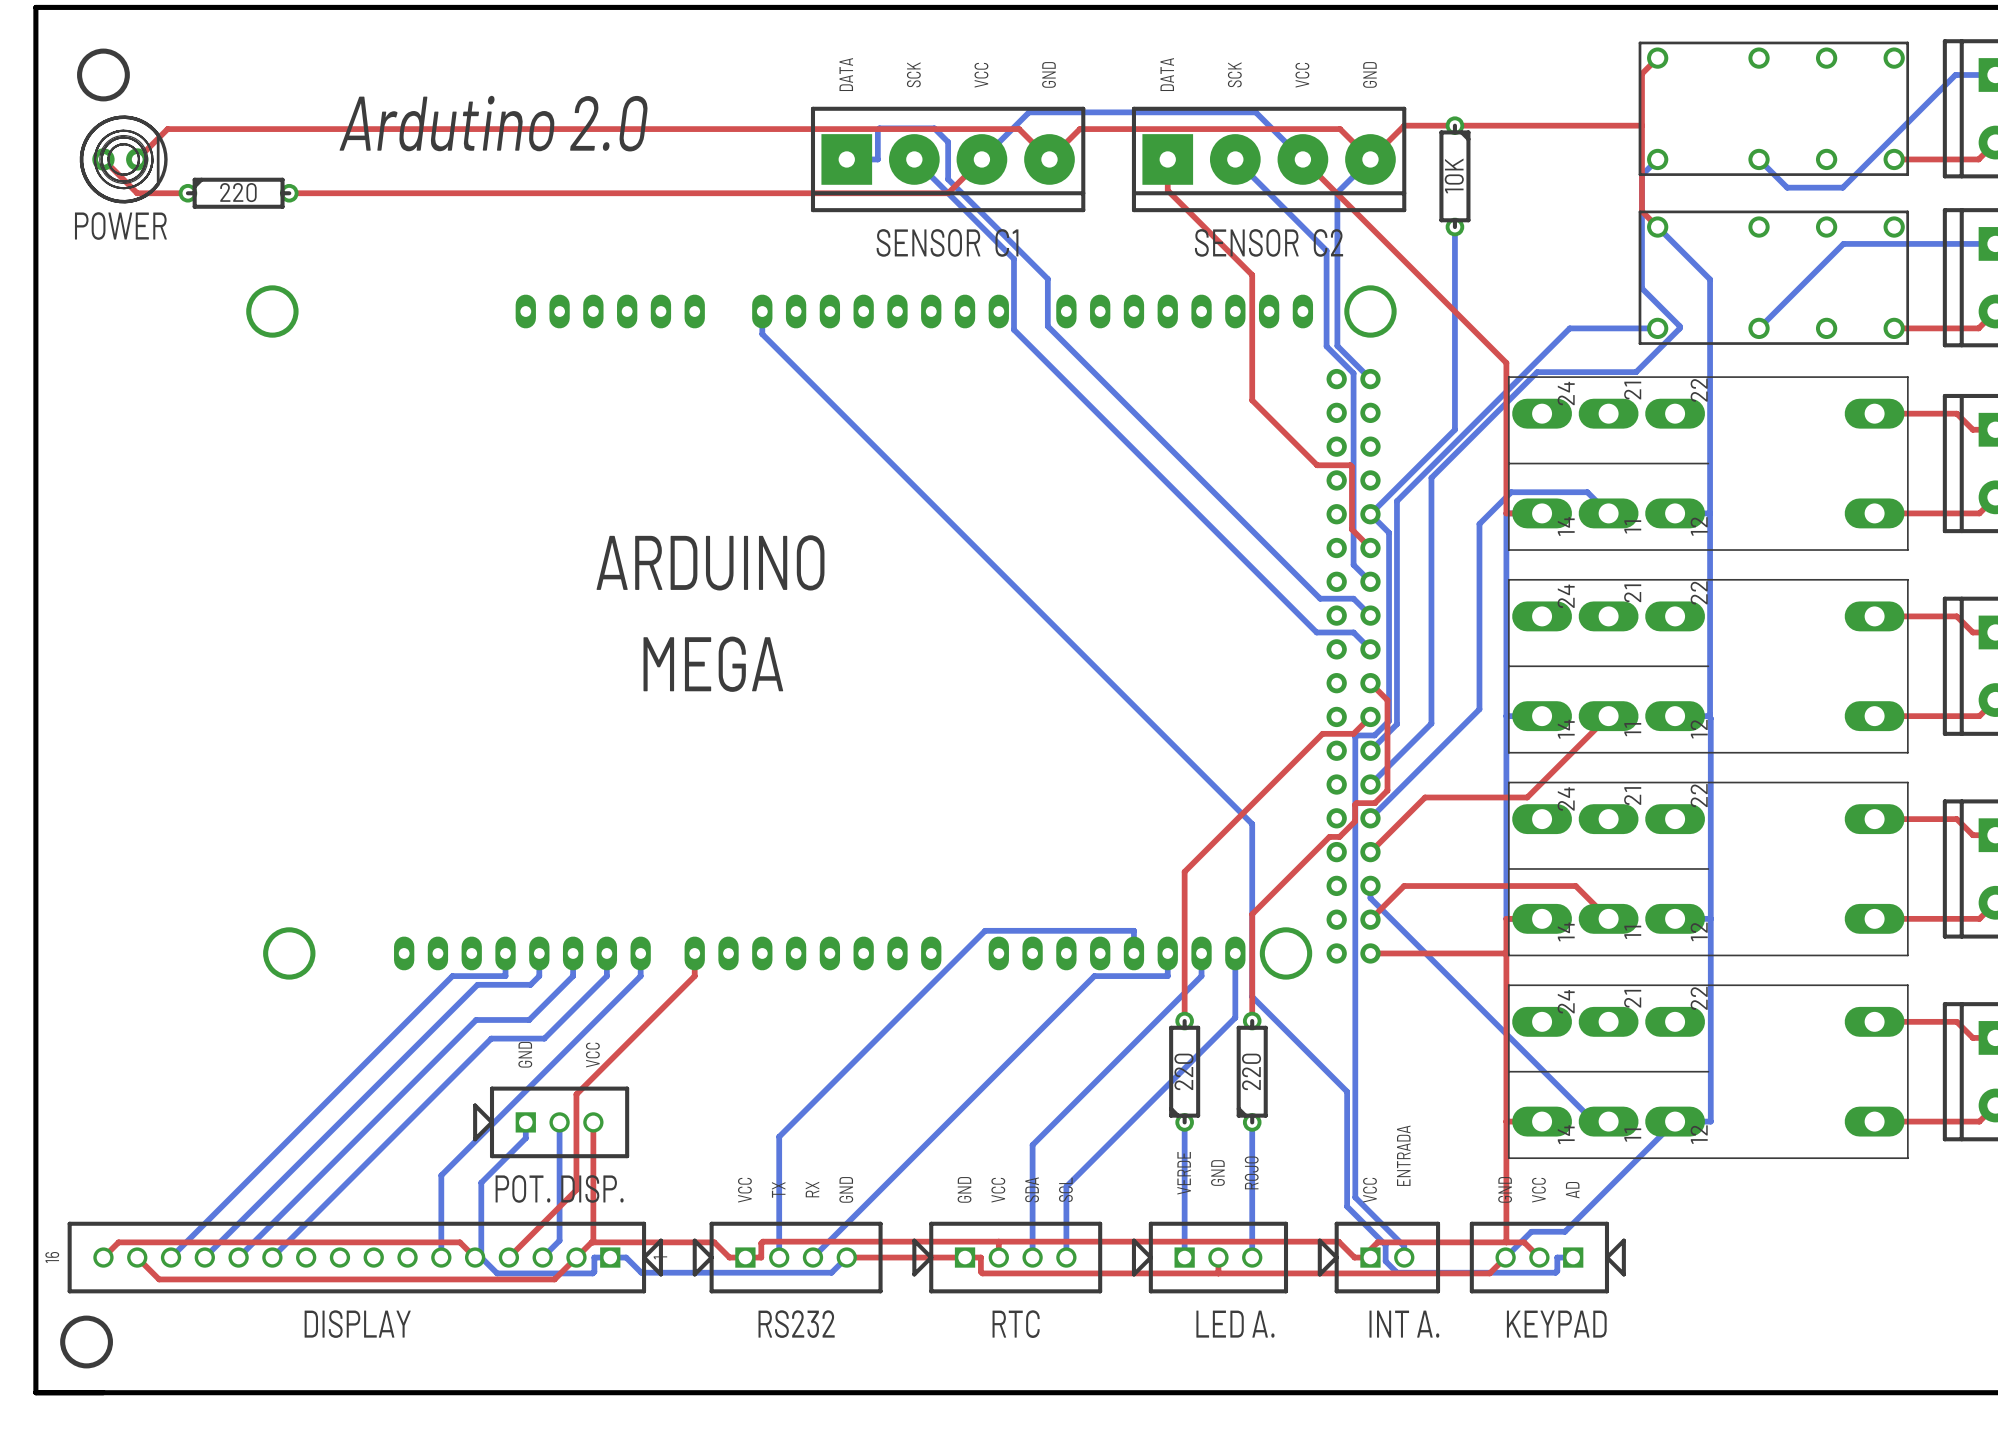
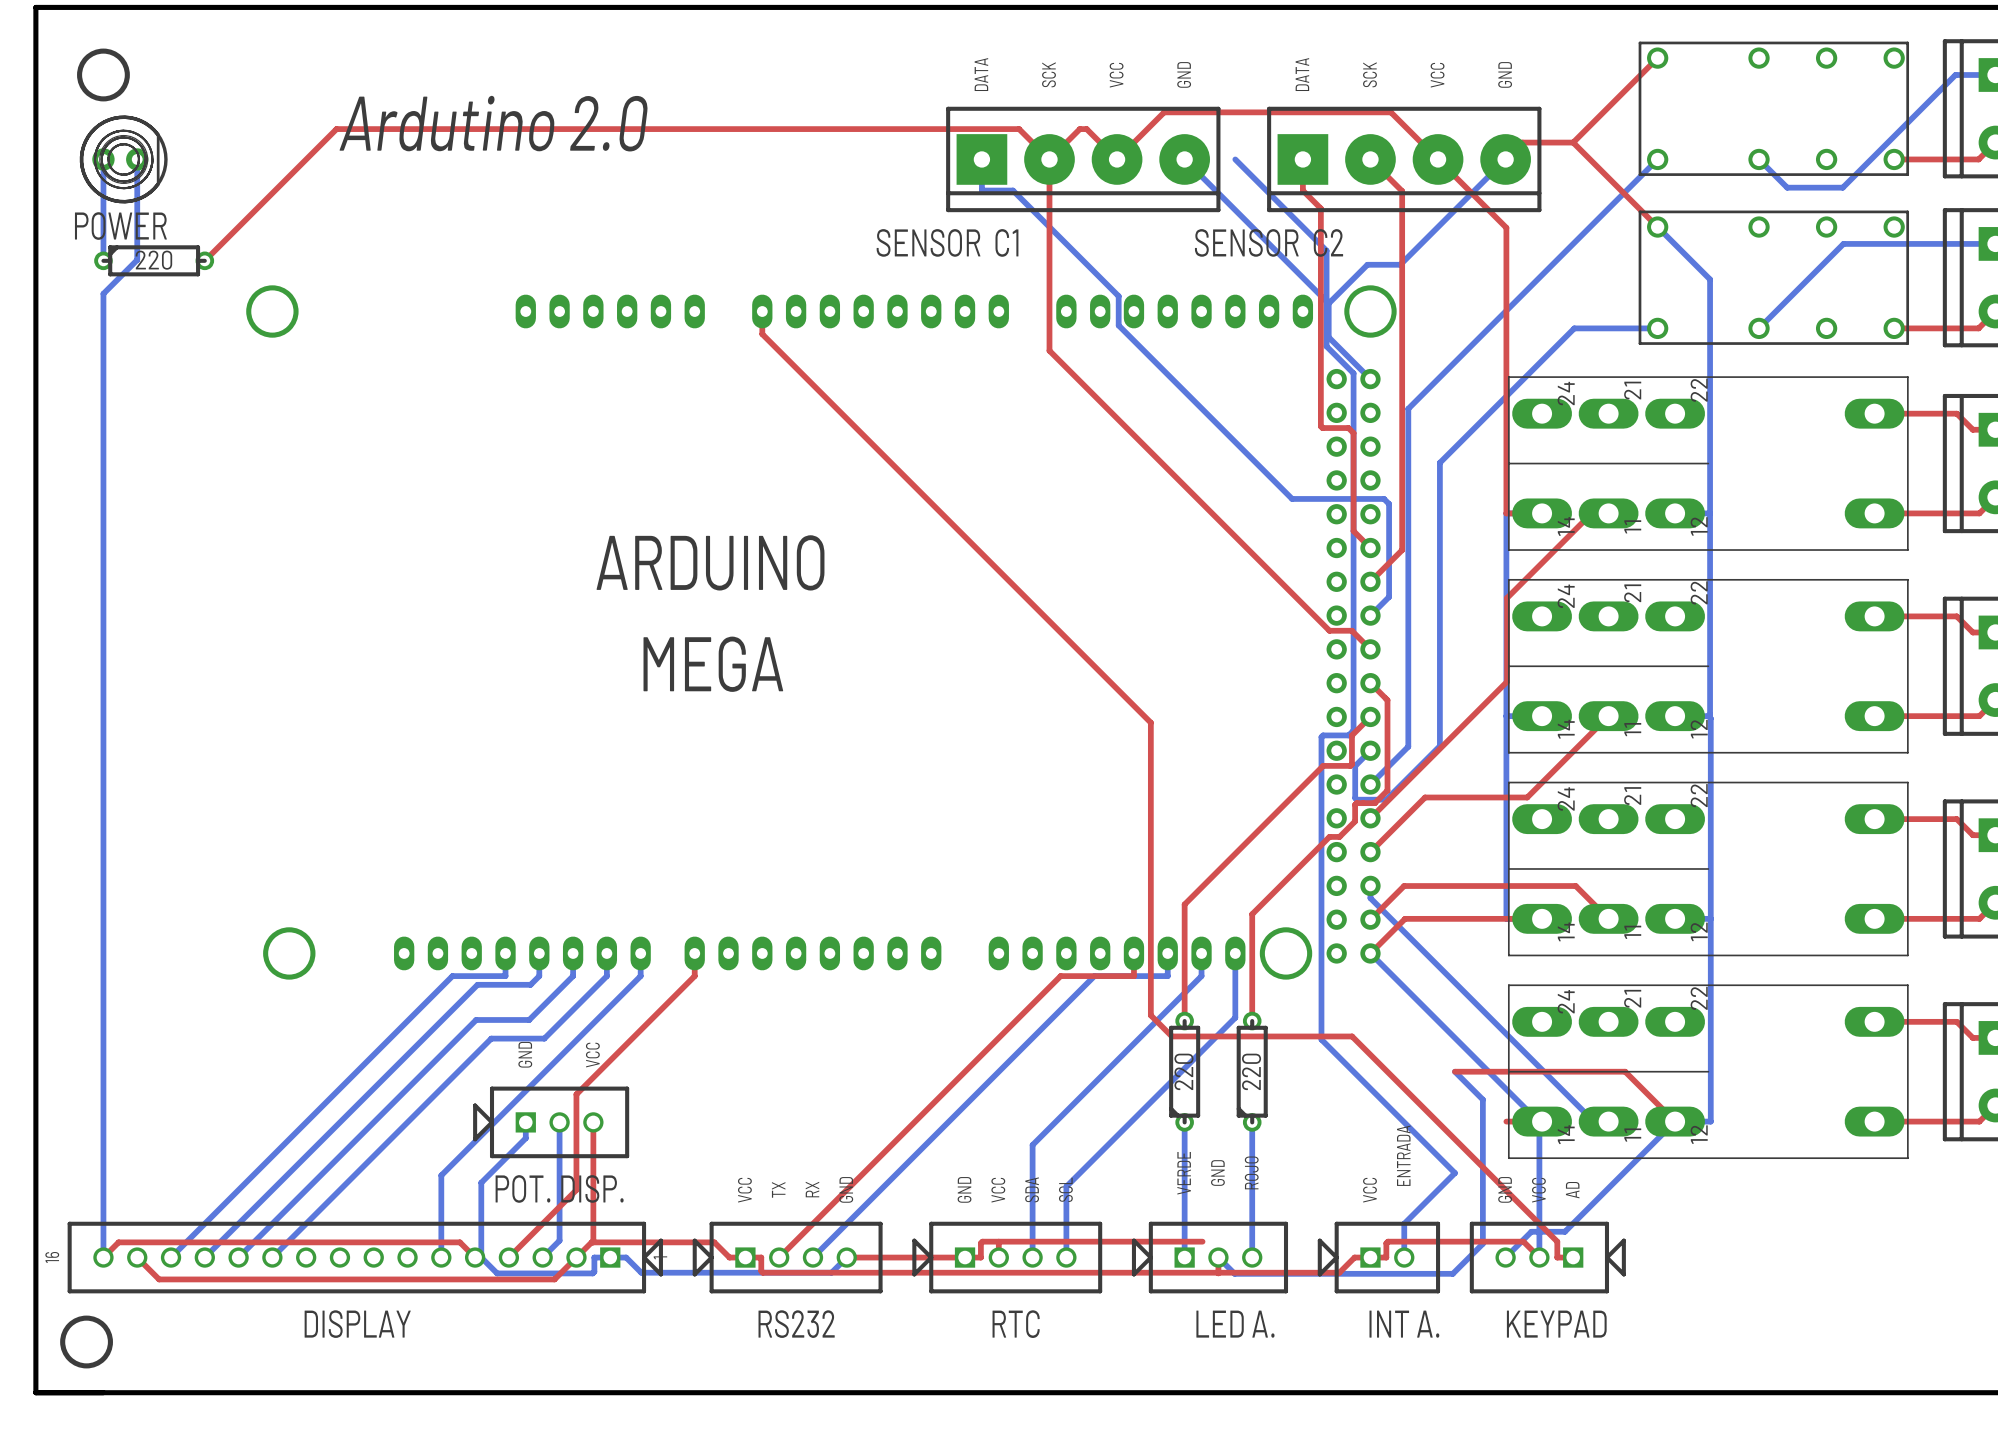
top track: (1641, 73) (1641, 211) -> (1573, 142) (1641, 211)
top track: none -> (1641, 73) (1573, 142)
text: DATA (846, 74) -> none
text: SCK (913, 74) -> none
text: GND (1048, 74) -> SCK (1049, 74)
text: DATA (1167, 74) -> none
text: none -> GND (1184, 74)
text: SCK (1234, 74) -> none
text: GND (1369, 74) -> SCK (1369, 74)
text: none -> GND (1505, 74)
text: VCC (981, 75) -> DATA (981, 74)
text: none -> VCC (1116, 75)
text: VCC (1302, 75) -> DATA (1302, 74)
text: none -> VCC (1437, 75)
top track: (1641, 125) (1404, 125) (1370, 159) (1340, 129) (1086, 129) -> none
top track: (336, 129) (167, 129) (137, 159) -> (336, 129) (204, 260)
top track: none -> (1573, 142) (1522, 142) (1505, 159)
bottom track: none -> (103, 159) (103, 260)
top track: (103, 159) (137, 193) (187, 193) -> none
bottom track: none -> (137, 159) (137, 259) (103, 293) (103, 1257)
bottom track: (846, 159) (877, 159) (877, 130) (879, 128) (934, 128) (948, 142) (948, 179) (1047, 279) (1047, 326) (1320, 598) (1353, 598) (1370, 615) -> (1389, 596) (1370, 615)
bottom track: (914, 159) (1013, 259) (1013, 329) (1316, 632) (1353, 632) (1370, 649) -> none
part: (948, 159) -> none
bottom track: (981, 159) (1029, 112) (1255, 112) (1302, 159) -> (981, 159) (981, 190) (1013, 190) (1118, 296) (1118, 325) (1292, 498) (1384, 498) (1389, 504) (1389, 532)
top track: (981, 159) (948, 193) (289, 193) -> none
top track: none -> (1049, 159) (1049, 350) (1329, 630) (1351, 630) (1370, 649)
part: none -> (1083, 159)
top track: (1167, 159) (1167, 190) (1252, 275) (1252, 400) (1317, 465) (1350, 465) (1351, 466) (1351, 529) (1353, 531) -> (1302, 159) (1302, 190) (1320, 208) (1320, 426) (1322, 428) (1348, 428) (1353, 433) (1353, 531)
bottom track: none -> (1184, 159) (1328, 303)
part: (1269, 159) -> none
top track: (1302, 159) (1506, 362) -> (1086, 129) (1117, 159) (1164, 112) (1390, 112) (1506, 227) (1506, 362)
bottom track: (1370, 159) (1337, 192) (1337, 346) -> (1328, 303) (1328, 337) (1337, 346)
top track: none -> (1370, 159) (1402, 191) (1402, 550) (1370, 581)
part: none -> (1404, 159)
bottom track: none -> (1505, 159) (1400, 264) (1367, 264) (1328, 303)
bottom track: (1641, 175) (1641, 288) (1679, 326) (1679, 328) (1636, 372) (1537, 372) (1431, 477) (1431, 723) (1408, 746) -> (1641, 175) (1408, 408) (1408, 746)
part: 10K (1454, 176) -> none
part position: (238, 193) -> (154, 260)
bottom track: (1454, 227) (1454, 429) (1370, 514) (1389, 532) -> none
bottom track: (762, 311) (762, 334) (1252, 824) (1252, 996) (1347, 1091) (1347, 1206) (1385, 1245) (1385, 1261) (1397, 1272) (1555, 1272) (1557, 1257) (1573, 1257) -> none
top track: none -> (762, 311) (762, 334) (1150, 722) (1150, 1015) (1171, 1036) (1352, 1036) (1557, 1241) (1557, 1257) (1573, 1257)
bottom track: (1574, 328) (1569, 328) (1396, 501) (1396, 724) (1370, 750) -> (1574, 328) (1439, 462) (1439, 746) (1386, 799) (1356, 799) (1355, 798) (1355, 766) (1370, 750)
bottom track: (1608, 513) (1587, 492) (1511, 492) (1479, 523) (1479, 709) (1370, 818) -> none
top track: none -> (1608, 513) (1591, 513) (1507, 597) (1507, 681) (1370, 818)
bottom track: (1353, 564) (1370, 581) -> none
bottom track: (1389, 596) (1389, 720) (1374, 735) (1355, 737) (1355, 1197) (1404, 1246) -> (1353, 564) (1353, 730) (1348, 735) (1323, 735) (1321, 737) (1321, 1039) (1454, 1173) (1404, 1223) (1404, 1246)
top track: (1353, 733) (1322, 733) (1184, 871) (1184, 904) -> (1353, 733) (1351, 735) (1351, 764) (1350, 765) (1323, 765) (1184, 904)
top track: (1506, 918) (1506, 1242) -> none
bottom track: (1133, 953) (1133, 930) (985, 930) (779, 1136) (779, 1257) -> none
top track: none -> (1133, 953) (1133, 976) (1060, 976) (779, 1257)
bottom track: none -> (1370, 953) (1529, 1112) (1529, 1121)
top track: (1370, 953) (1506, 953) -> (1370, 953) (1405, 918) (1506, 918)
bottom track: none -> (1454, 1071) (1482, 1099) (1482, 1243) (1452, 1273) (1234, 1273) (1218, 1257)
top track: none -> (1454, 1071) (1625, 1071) (1675, 1121)
bottom track: none -> (1529, 1121) (1539, 1131) (1539, 1257)
top track: (982, 1241) (762, 1241) (761, 1257) -> (982, 1241) (980, 1257)
top track: (1202, 1241) (1338, 1241) (1354, 1257) -> (761, 1257) (762, 1272) (1339, 1272) (1354, 1257)
top track: (1524, 1242) (1377, 1242) (1362, 1257) -> (1524, 1242) (1387, 1241) (1386, 1257) (1370, 1257)
top track: (980, 1257) (982, 1273) (1489, 1273) (1505, 1257) -> none

